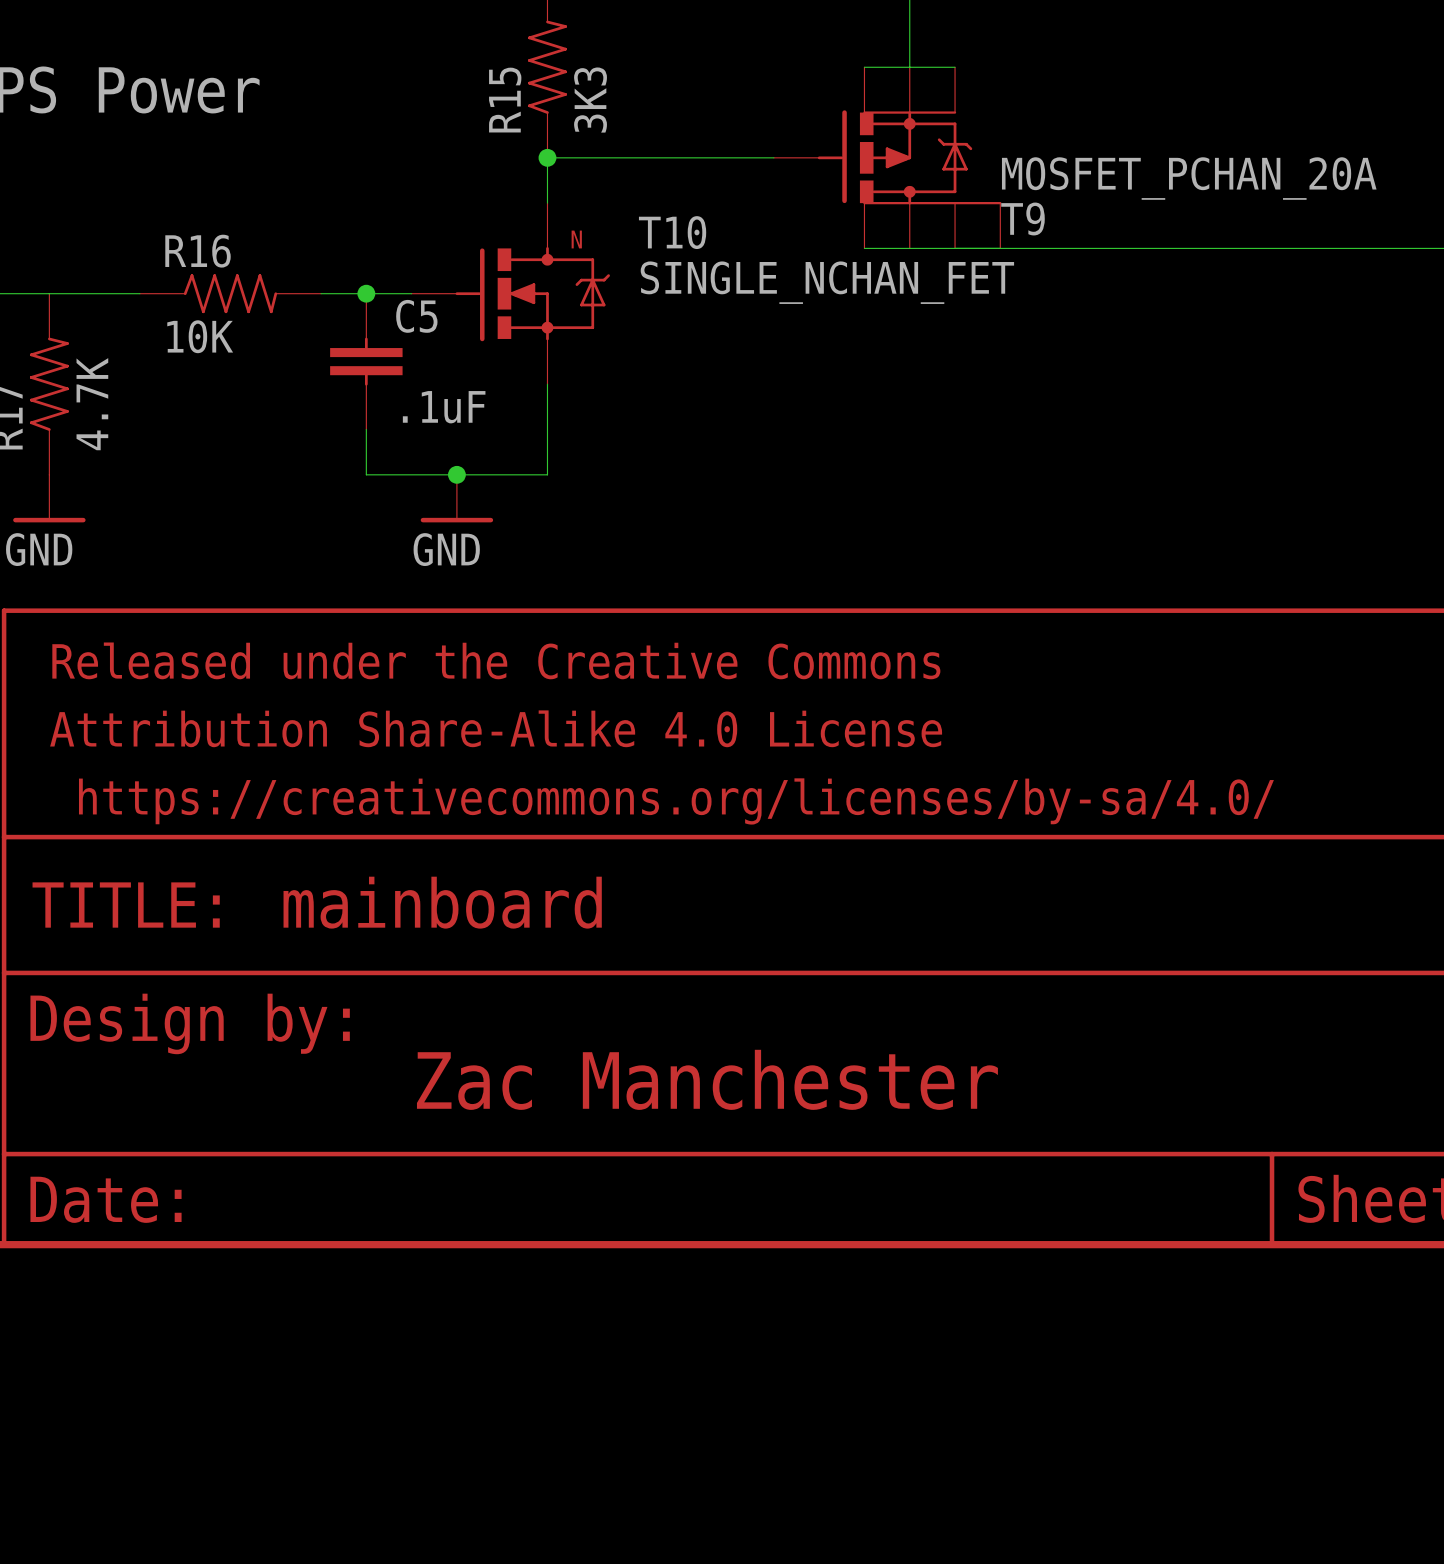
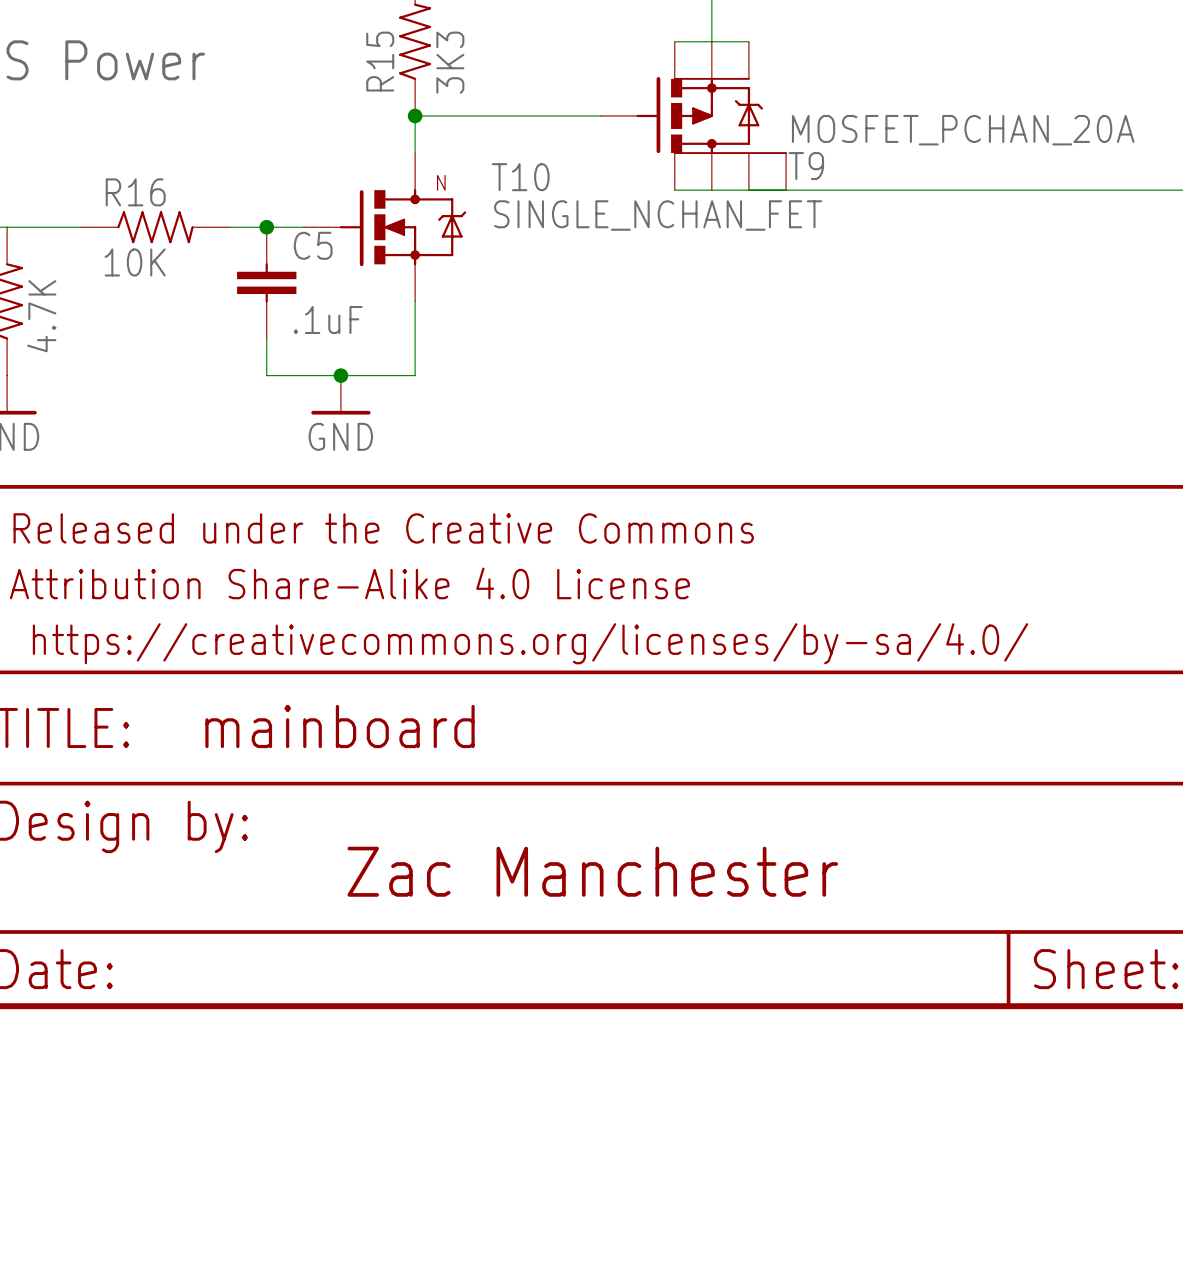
text position: Zac Manchester (707, 1079) -> Zac Manchester (592, 871)

